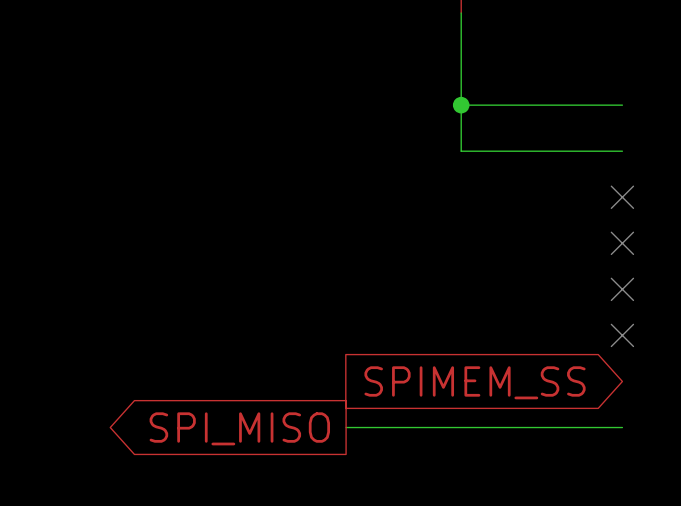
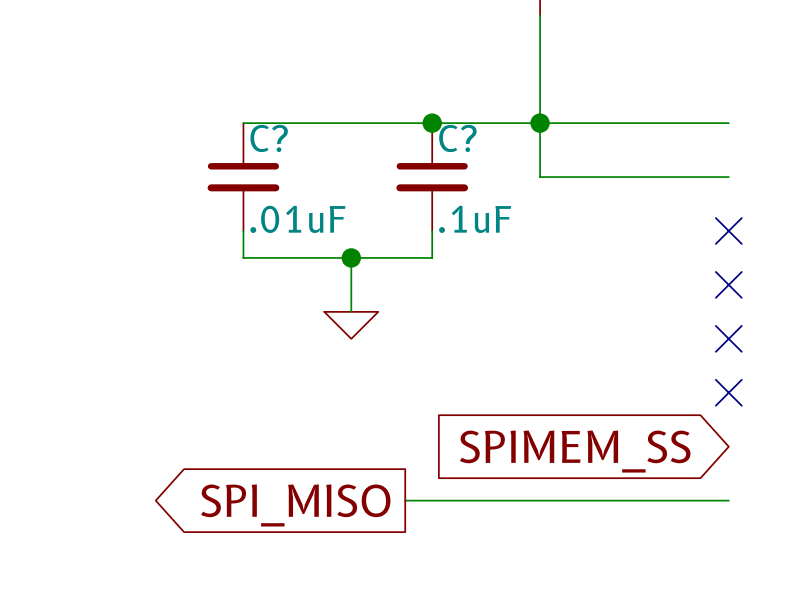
wire: none -> (243, 123) (540, 123)
junction: none -> (432, 123)
C?: none -> .01uF (243, 177)
C?: none -> .1uF (432, 177)
wire: none -> (243, 230) (243, 257) (432, 257) (432, 230)
wire: none -> (351, 257) (351, 311)
junction: none -> (351, 257)
power symbol: none -> (351, 325)

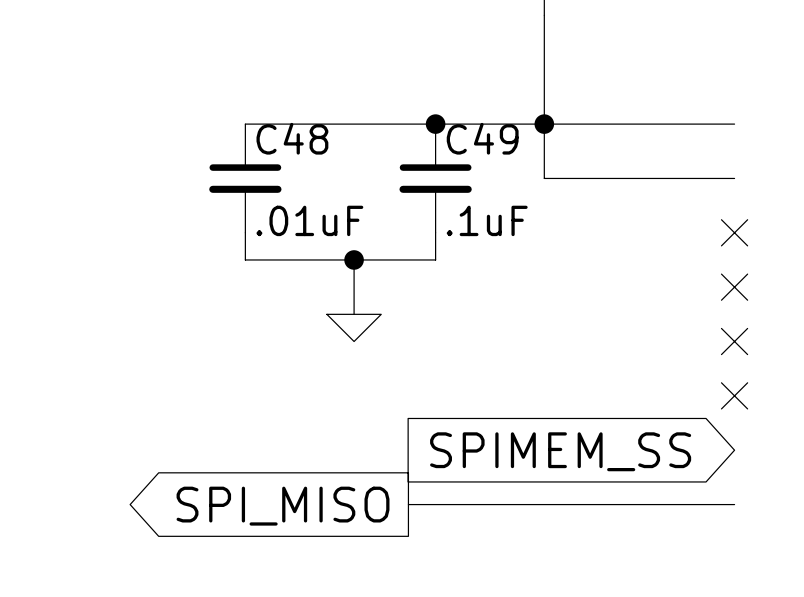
C? name: C? (269, 138) -> C48 (292, 138)
C? name: C? (457, 138) -> C49 (482, 138)

